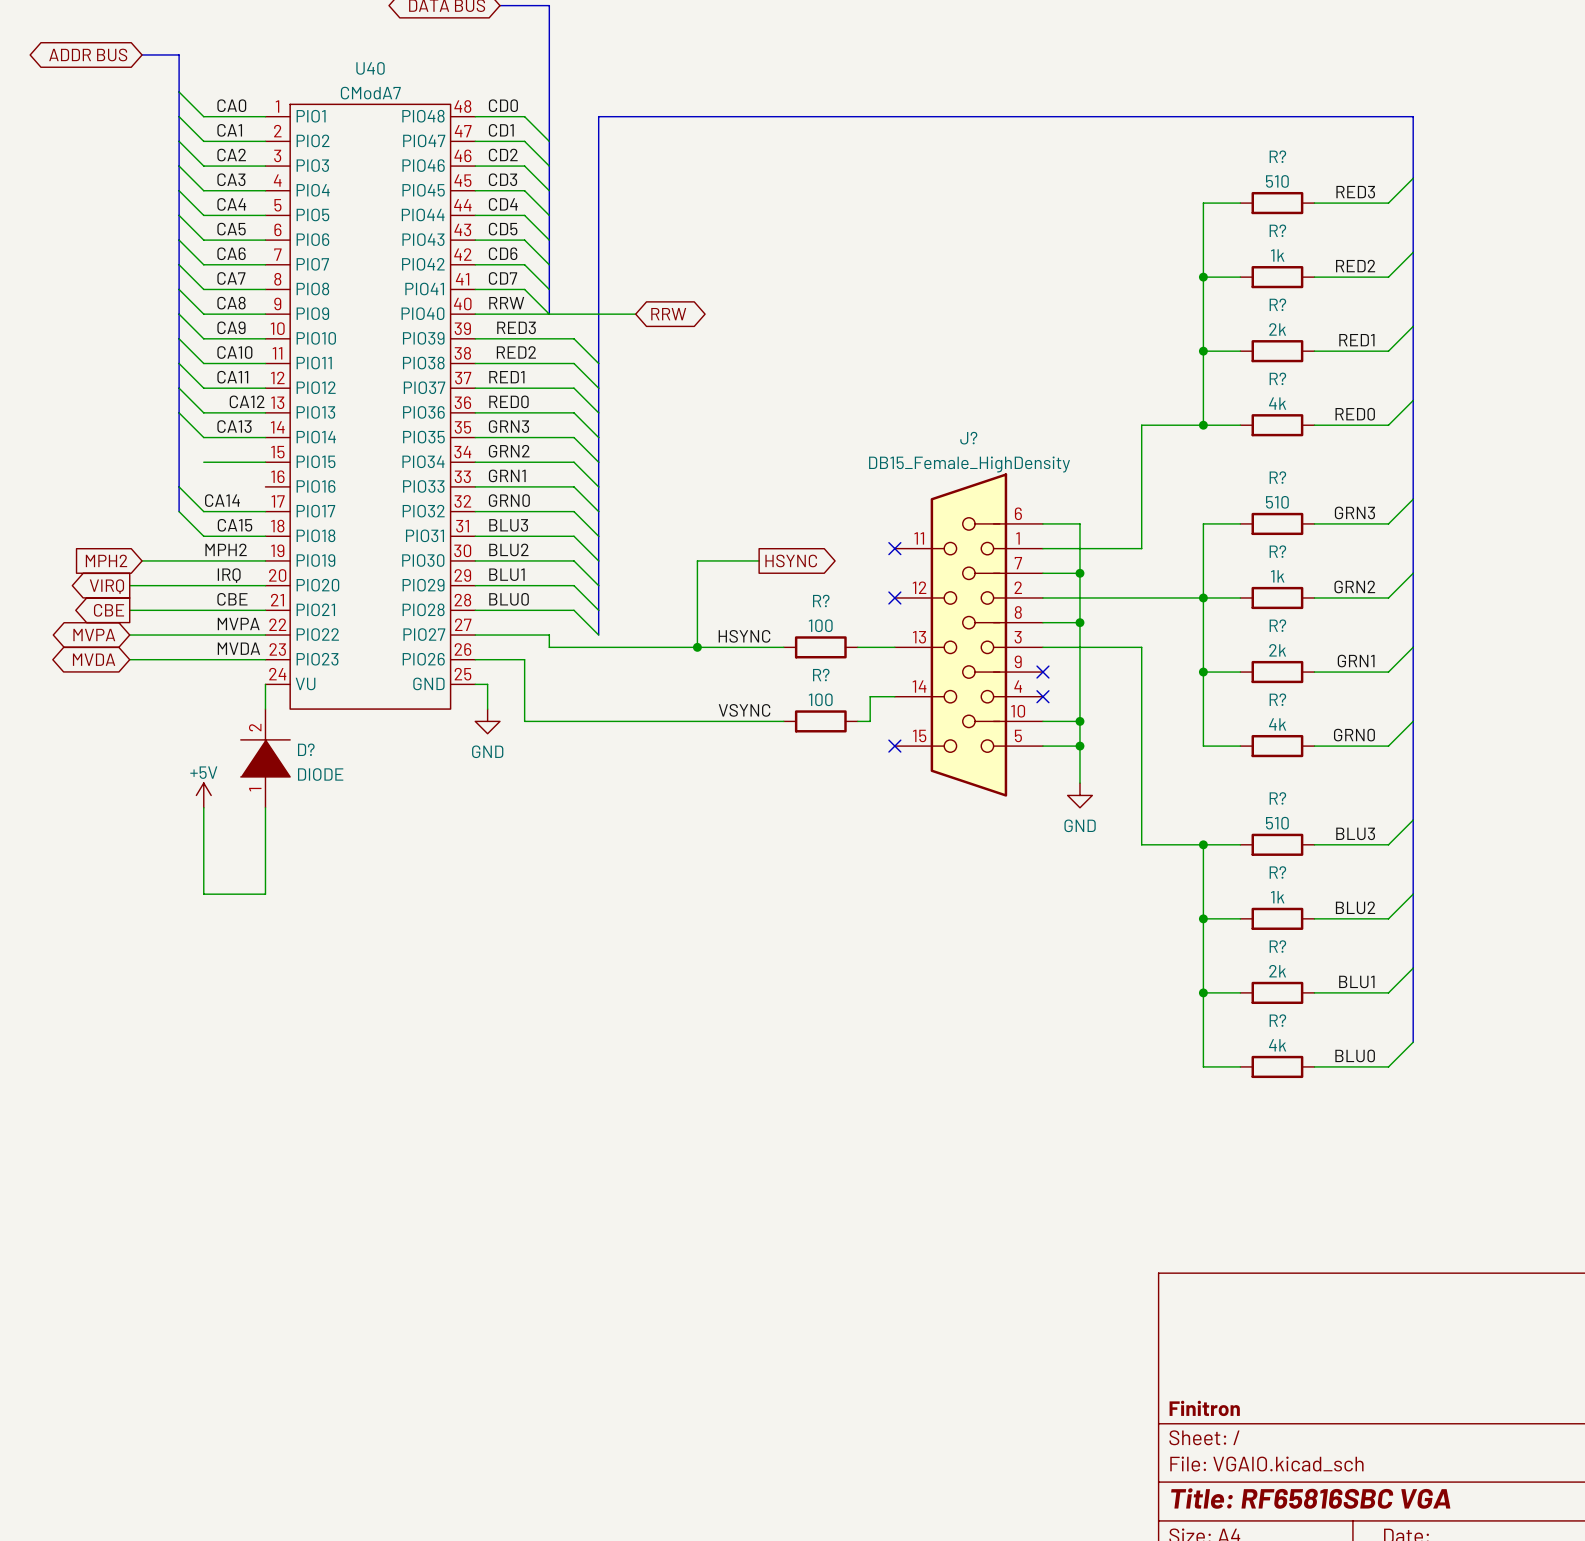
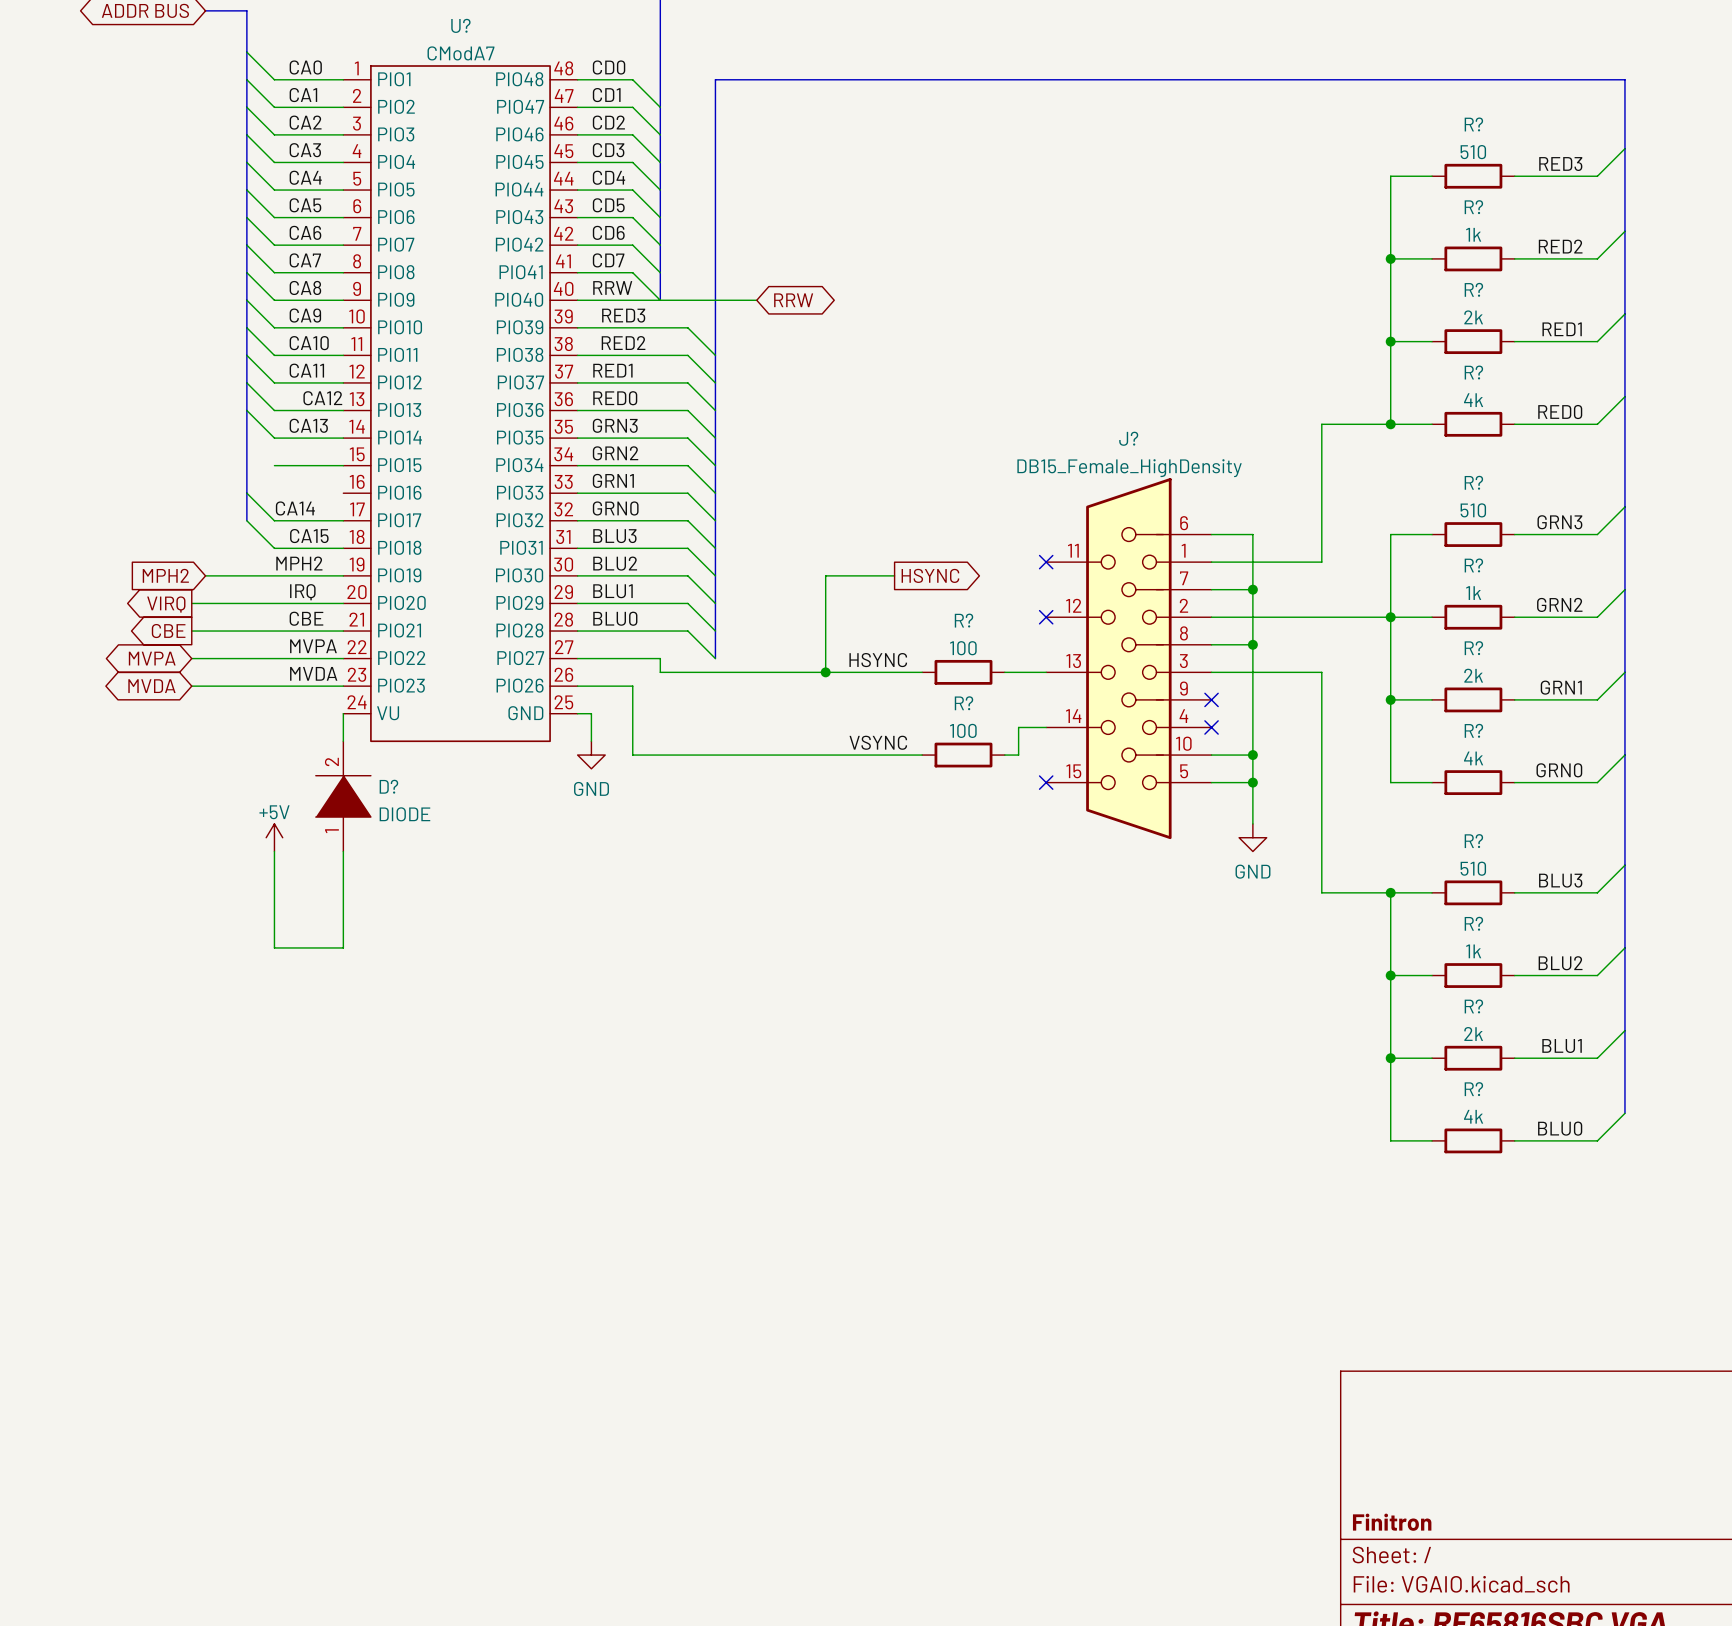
U40 name: U40 (370, 68) -> U? (460, 25)

